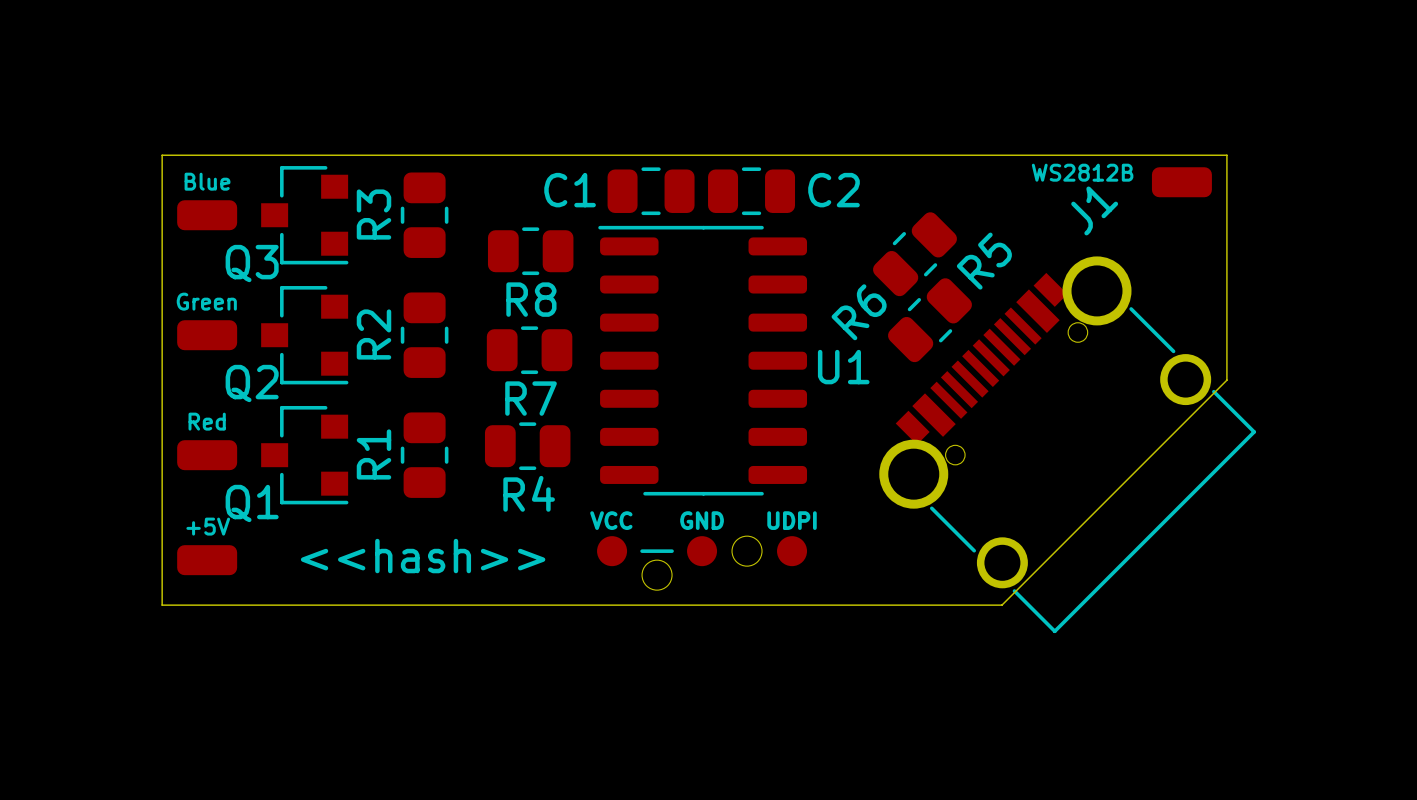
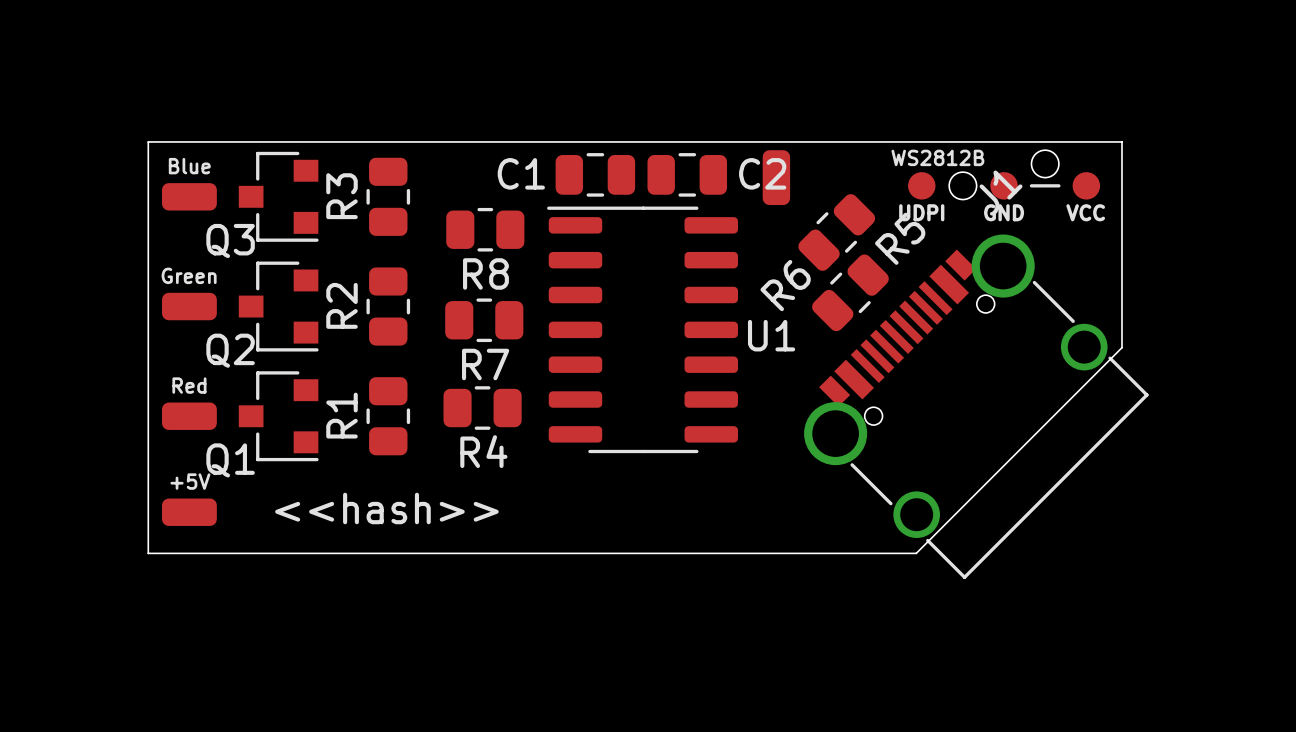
text position: WS2812B (1082, 172) -> WS2812B (937, 157)
part rotation: 0° (1181, 182) -> 90° clockwise (776, 177)
part position: (1181, 182) -> (776, 177)
part rotation: 0° (702, 563) -> 180° (1004, 174)
part position: (702, 563) -> (1004, 174)

